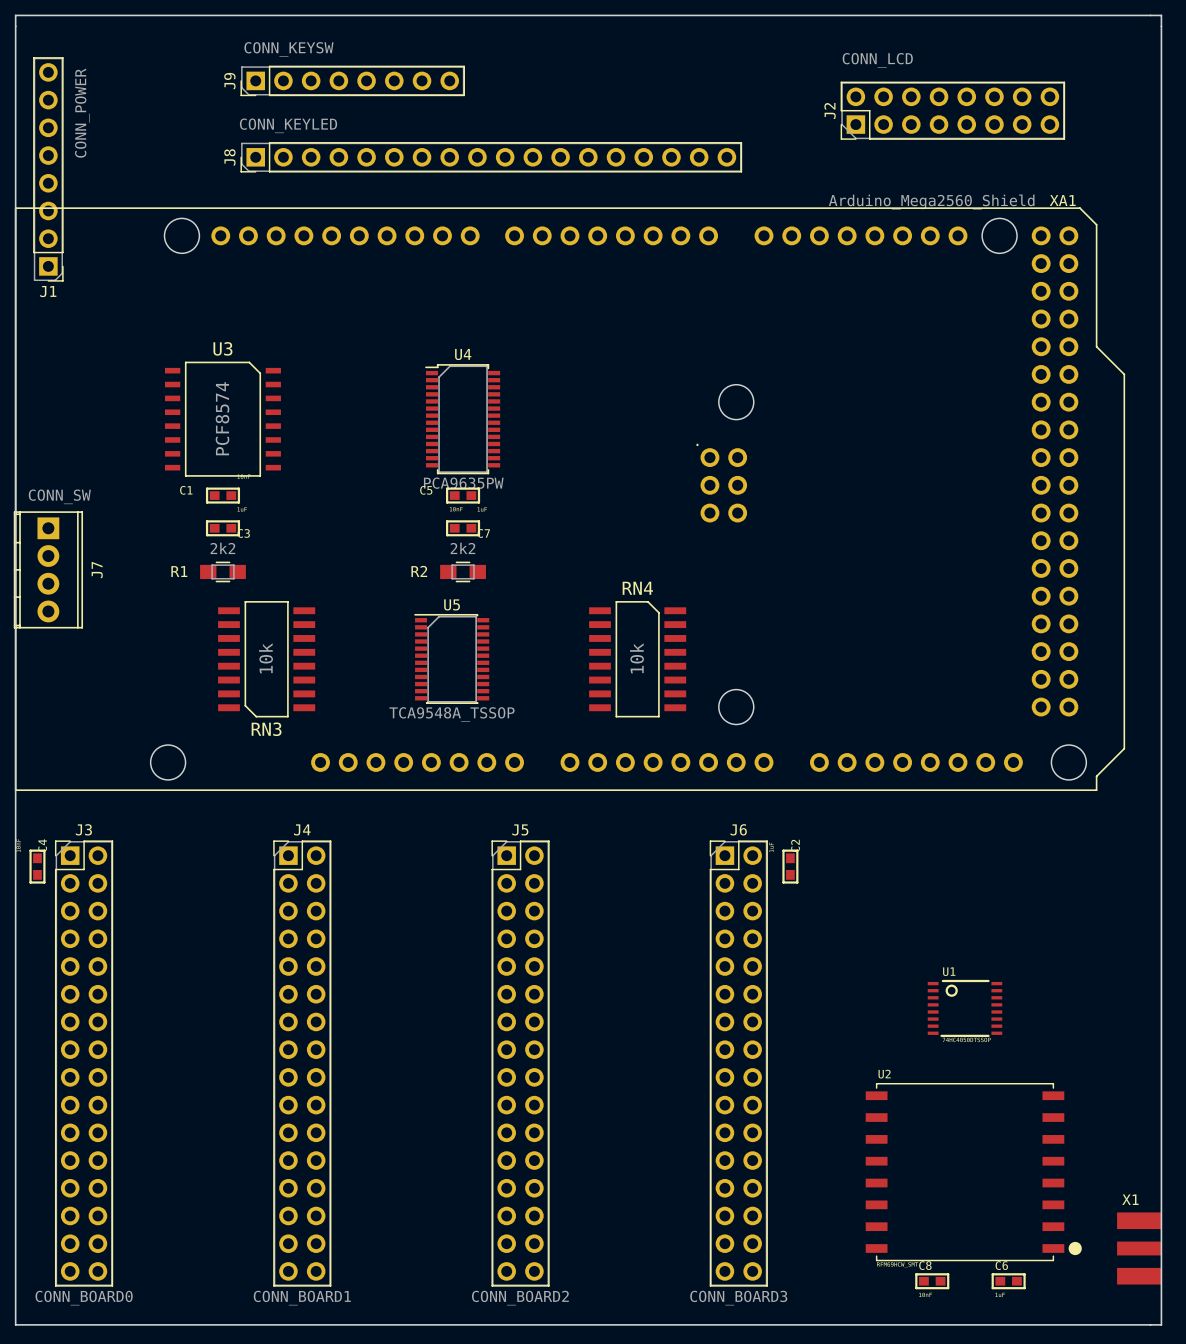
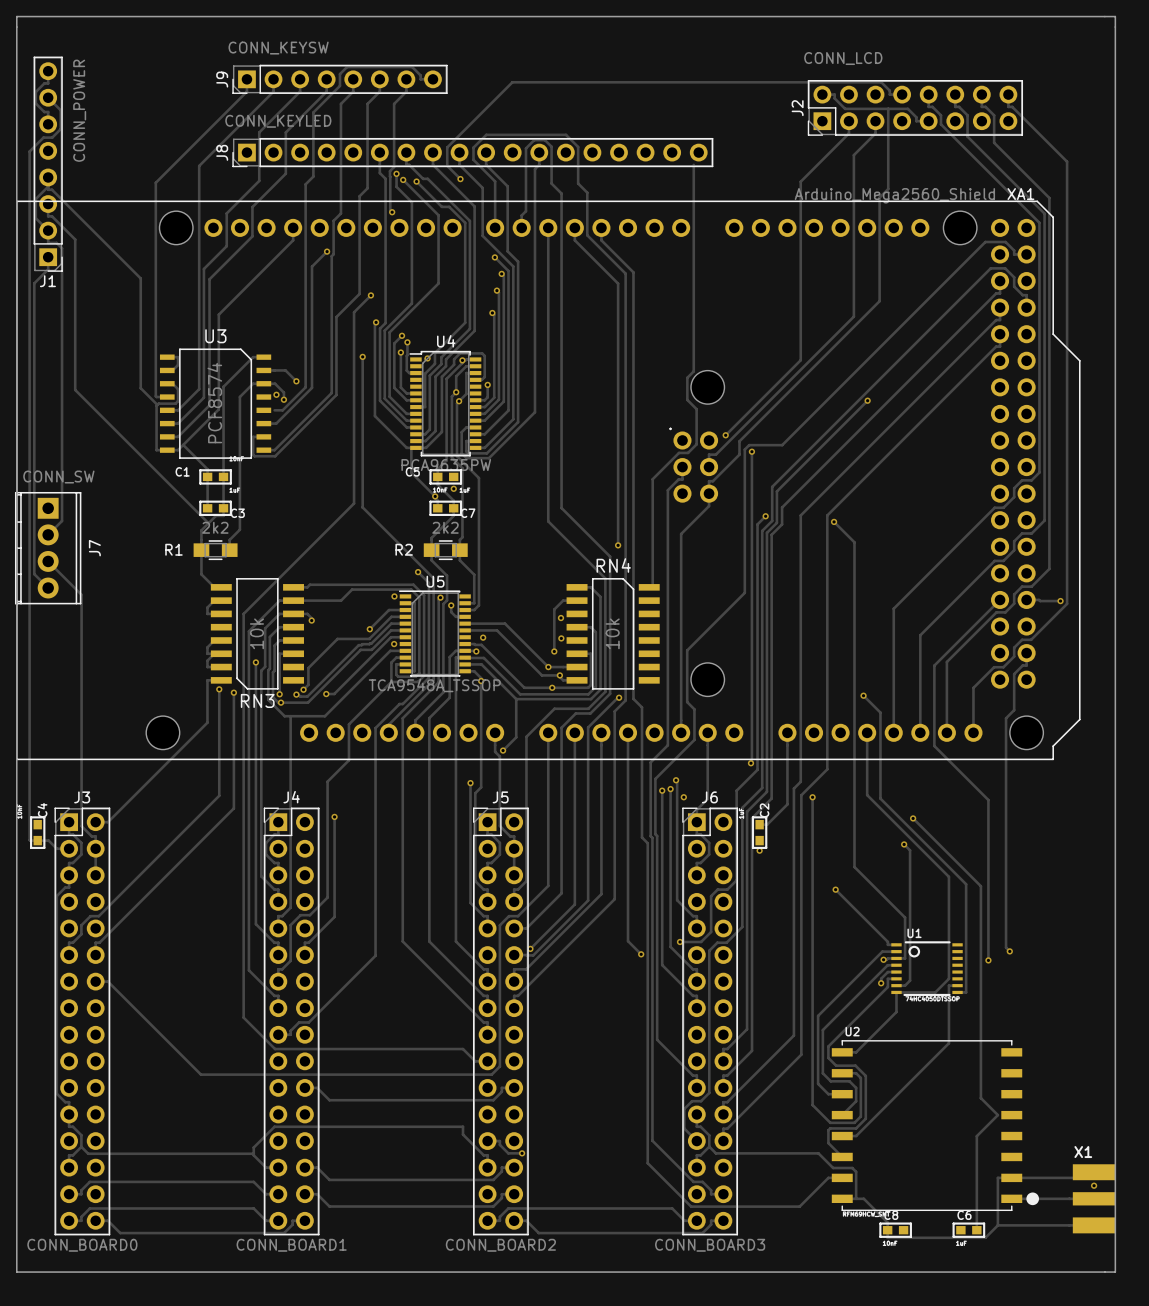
track: none -> (48, 71) (48, 83) (44, 83) (35, 91) (35, 103) (44, 112) (48, 112) (48, 124)
track: none -> (246, 79) (246, 91) (155, 182) (155, 396) (167, 397)
track: none -> (273, 79) (273, 91) (199, 165) (199, 389) (178, 410) (167, 410)
track: none -> (300, 79) (300, 91) (259, 132) (259, 180) (226, 213) (226, 246) (203, 269) (203, 397) (178, 423) (167, 423)
track: none -> (326, 79) (326, 91) (285, 132) (285, 173) (252, 207) (252, 236) (209, 279) (209, 405) (178, 436) (167, 436)
track: none -> (353, 79) (353, 91) (340, 103) (340, 213) (333, 220) (333, 254) (331, 256) (331, 393) (274, 450) (263, 450)
track: none -> (379, 79) (379, 91) (367, 103) (367, 188) (359, 196) (359, 293) (336, 317) (336, 394) (275, 456) (253, 454) (253, 436) (263, 436)
track: none -> (406, 79) (406, 91) (394, 103) (394, 167) (389, 171) (390, 210) (392, 212)
track: none -> (432, 79) (420, 79) (420, 75) (412, 67) (347, 67) (339, 74) (339, 85) (313, 112) (313, 176) (305, 184) (305, 387) (282, 410) (274, 410)
track: none -> (822, 94) (834, 94) (834, 98) (845, 108) (907, 108) (916, 117) (916, 121) (928, 121)
track: none -> (902, 94) (889, 94) (889, 90) (881, 82) (512, 82) (447, 147) (447, 165) (460, 179)
track: none -> (928, 94) (928, 106) (932, 106) (940, 115) (940, 124) (1039, 222) (1039, 472) (1031, 480) (1022, 480) (1014, 488) (1014, 497) (1003, 507) (994, 507) (893, 608) (893, 732)
track: none -> (955, 94) (955, 106) (959, 106) (967, 115) (967, 136) (1044, 213) (1044, 520) (1031, 533) (1022, 533) (1014, 541) (1014, 550) (1003, 560) (994, 560) (920, 635) (920, 732)
track: none -> (981, 94) (981, 106) (985, 106) (994, 115) (994, 142) (1049, 198) (1049, 568) (1031, 586) (1022, 586) (1014, 594) (1014, 603) (1005, 612) (996, 612) (946, 661) (946, 732)
track: none -> (1008, 94) (1008, 106) (1012, 106) (1067, 161) (1067, 603) (1031, 639) (1022, 639) (1014, 647) (1014, 656) (1003, 667) (994, 667) (973, 687) (973, 732)
track: none -> (48, 97) (60, 110) (60, 129) (52, 137) (43, 137) (29, 151) (29, 840) (48, 840) (56, 848) (69, 848)
track: none -> (888, 108) (888, 189) (879, 197) (879, 301) (739, 441) (739, 454) (712, 481) (709, 481) (709, 506) (681, 533) (681, 732)
track: none -> (848, 121) (848, 133) (800, 181) (800, 360) (725, 435)
track: none -> (875, 121) (875, 133) (853, 155) (853, 316) (715, 454) (709, 454) (709, 467)
track: none -> (379, 152) (379, 173) (385, 178) (385, 323) (380, 328) (380, 400) (406, 427) (415, 427)
track: none -> (406, 152) (406, 164) (409, 164) (423, 178) (427, 178) (469, 220) (469, 328) (441, 357) (441, 364) (429, 375) (429, 429) (425, 434) (415, 434)
track: none -> (432, 152) (432, 164) (474, 206) (474, 330) (446, 359) (446, 366) (435, 376) (435, 431) (425, 441) (415, 441)
track: none -> (459, 152) (459, 164) (482, 188) (482, 235) (513, 266) (513, 419) (484, 447) (475, 447)
track: none -> (486, 152) (486, 164) (507, 186) (507, 251) (518, 261) (518, 422) (486, 453) (468, 453) (466, 451) (466, 441) (475, 441)
track: none -> (539, 152) (539, 164) (534, 169) (534, 412) (489, 458) (466, 458) (461, 453) (461, 432) (466, 427) (475, 427)
track: none -> (693, 164) (693, 371) (687, 377) (687, 399) (696, 409) (696, 444) (688, 452) (679, 452) (652, 479) (652, 587) (649, 587)
track: none -> (396, 173) (396, 186) (411, 202) (411, 303) (384, 330) (384, 398) (406, 420) (415, 420)
via: none -> (396, 173)
track: none -> (48, 177) (48, 189) (52, 189) (140, 278) (140, 388) (157, 404)
via: none -> (460, 179)
track: none -> (403, 179) (438, 215) (438, 283) (389, 332) (389, 396) (406, 413) (415, 413)
via: none -> (403, 179)
track: none -> (416, 181) (441, 206) (449, 206) (465, 222) (465, 322) (434, 353) (434, 363) (425, 373) (425, 407) (415, 407)
via: none -> (416, 181)
track: none -> (48, 186) (35, 199) (35, 218) (48, 230) (48, 242) (56, 242) (62, 248) (62, 521) (48, 534)
track: none -> (48, 204) (48, 216) (52, 216) (75, 239) (75, 389) (208, 523)
via: none -> (392, 212)
track: none -> (293, 227) (293, 240) (218, 314) (218, 409) (178, 450) (156, 450) (156, 405) (158, 403) (175, 403) (178, 401) (178, 389) (172, 383) (167, 383)
track: none -> (495, 227) (495, 181) (473, 159) (473, 147) (486, 134) (566, 134) (578, 147) (578, 183) (587, 192) (587, 235) (625, 273) (625, 700) (614, 711) (614, 899) (518, 995) (514, 995) (514, 1008)
track: none -> (521, 227) (521, 215) (525, 211) (525, 148) (534, 140) (544, 140) (551, 146) (551, 183) (561, 193) (561, 508) (610, 556) (610, 693) (590, 713) (575, 713) (561, 727) (561, 893) (526, 928) (514, 928)
track: none -> (548, 227) (548, 521) (605, 578) (605, 691) (588, 708) (554, 708) (526, 736) (526, 881) (518, 889) (514, 889) (514, 901)
track: none -> (574, 227) (574, 240) (618, 283) (618, 545)
track: none -> (601, 227) (601, 240) (633, 272) (633, 698) (642, 707) (642, 837) (647, 843) (647, 1163) (691, 1206) (799, 1206) (828, 1177) (842, 1177)
track: none -> (327, 251) (312, 266) (312, 387) (276, 423) (263, 423)
via: none -> (327, 251)
track: none -> (1026, 254) (1014, 254) (1014, 250) (1005, 242) (985, 242) (782, 445) (749, 445) (744, 449) (744, 592) (687, 650) (687, 702) (694, 709) (694, 739) (655, 778) (657, 1039) (693, 1075) (696, 1075) (696, 1087)
track: none -> (48, 257) (48, 269) (34, 283) (34, 574) (48, 588)
track: none -> (494, 257) (508, 271) (508, 410) (484, 434) (475, 434)
via: none -> (494, 257)
track: none -> (501, 273) (503, 276) (503, 401) (484, 420) (475, 420)
via: none -> (501, 273)
track: none -> (1000, 281) (1000, 293) (996, 293) (782, 507) (782, 524) (771, 534) (771, 798) (752, 818) (752, 1050) (727, 1075) (723, 1075) (723, 1087)
track: none -> (496, 290) (498, 292) (498, 399) (484, 413) (475, 413)
via: none -> (496, 290)
track: none -> (370, 295) (354, 312) (354, 503) (243, 613) (243, 1017) (275, 1049) (463, 1049) (475, 1061) (487, 1061)
via: none -> (370, 295)
track: none -> (1000, 307) (1000, 320) (996, 320) (800, 515) (800, 781) (793, 788) (793, 1035) (727, 1102) (723, 1102) (723, 1114)
track: none -> (1026, 307) (1026, 295) (1022, 295) (1014, 286) (1014, 277) (1005, 268) (990, 268) (772, 486) (772, 520) (762, 530) (762, 787) (742, 807) (742, 926) (726, 942) (717, 942) (709, 950) (709, 1092) (701, 1101) (692, 1101) (684, 1108) (684, 1128) (696, 1141)
track: none -> (492, 313) (494, 314) (494, 397) (484, 407) (475, 407)
via: none -> (492, 313)
track: none -> (376, 322) (374, 416) (406, 447) (426, 447) (441, 431) (441, 376) (454, 364) (454, 359) (460, 353) (482, 353) (484, 355) (484, 377) (481, 379) (475, 379)
via: none -> (376, 322)
track: none -> (1000, 334) (1000, 346) (996, 346) (827, 515) (827, 769) (801, 795) (801, 1054) (727, 1128) (723, 1128) (723, 1141)
track: none -> (402, 335) (394, 343) (394, 387) (406, 400) (415, 400)
via: none -> (402, 335)
track: none -> (407, 342) (406, 370) (409, 373) (415, 373)
via: none -> (407, 342)
track: none -> (400, 352) (400, 387) (406, 393) (415, 393)
via: none -> (400, 352)
track: none -> (167, 357) (178, 357) (178, 365) (172, 370) (167, 370)
track: none -> (263, 357) (253, 357) (223, 386) (223, 515) (215, 515) (201, 530) (201, 574) (214, 587) (221, 587)
track: none -> (362, 356) (362, 507) (433, 578) (433, 679) (388, 724) (388, 732)
via: none -> (362, 356)
via: none -> (427, 358)
track: none -> (475, 359) (462, 360) (462, 363) (446, 378) (446, 460) (437, 469) (437, 484) (453, 500) (453, 515) (431, 537) (431, 560) (447, 575) (447, 600) (443, 604) (443, 692) (415, 720) (415, 732)
via: none -> (462, 360)
track: none -> (475, 366) (466, 366) (456, 376) (456, 392) (451, 396) (451, 457) (462, 468) (462, 537) (459, 539) (459, 560) (474, 574) (474, 603) (465, 603)
track: none -> (263, 370) (285, 370) (296, 381)
track: none -> (475, 373) (466, 373) (466, 393) (456, 403) (456, 456) (478, 478) (478, 605) (474, 610) (465, 610)
via: none -> (296, 381)
track: none -> (487, 384) (487, 397) (484, 400) (475, 400)
via: none -> (487, 384)
via: none -> (456, 392)
via: none -> (276, 394)
track: none -> (283, 399) (283, 392) (275, 383) (253, 383) (239, 396) (239, 529) (229, 539) (229, 550)
via: none -> (283, 399)
via: none -> (459, 401)
track: none -> (867, 400) (776, 491) (776, 522) (766, 532) (766, 791) (747, 811) (747, 1029) (727, 1049) (723, 1049) (723, 1061)
via: none -> (867, 400)
via: none -> (725, 435)
track: none -> (183, 444) (207, 469) (207, 508)
track: none -> (411, 447) (411, 472) (435, 496) (437, 500) (437, 508)
track: none -> (751, 451) (750, 763)
via: none -> (751, 451)
track: none -> (682, 467) (682, 479) (678, 479) (667, 490) (667, 745) (650, 762) (652, 1140) (693, 1181) (702, 1181) (711, 1190) (711, 1194) (723, 1194)
via: none -> (453, 488)
via: none -> (435, 496)
track: none -> (765, 516) (757, 524) (757, 769) (736, 790) (736, 880) (727, 889) (717, 889) (711, 896) (711, 931) (701, 941) (680, 941)
via: none -> (765, 516)
track: none -> (834, 521) (854, 542) (854, 867) (905, 917) (905, 958) (883, 959)
via: none -> (834, 521)
via: none -> (618, 545)
track: none -> (48, 561) (81, 594) (81, 826) (91, 836) (95, 836) (95, 875)
track: none -> (418, 572) (428, 582) (428, 677) (375, 728) (375, 955) (308, 1022) (299, 1022) (290, 1030) (290, 1034) (278, 1034)
via: none -> (418, 572)
track: none -> (293, 587) (307, 587) (309, 584) (413, 584) (424, 595) (424, 675) (418, 681) (391, 681)
track: none -> (577, 587) (590, 587) (600, 596) (600, 689) (590, 699) (516, 699)
via: none -> (394, 596)
track: none -> (440, 597) (438, 599) (438, 682) (402, 718) (402, 941) (483, 1022) (487, 1022) (487, 1034)
via: none -> (440, 597)
track: none -> (1000, 599) (934, 665) (934, 746) (988, 800) (988, 960)
track: none -> (1026, 599) (1060, 601)
track: none -> (214, 600) (207, 607) (207, 613) (221, 613)
track: none -> (577, 600) (563, 600) (554, 609) (554, 651)
via: none -> (1060, 601)
track: none -> (405, 603) (414, 603) (414, 671) (405, 671)
track: none -> (451, 605) (451, 612) (455, 616) (465, 616)
via: none -> (451, 605)
track: none -> (405, 610) (389, 610) (369, 629)
track: none -> (405, 616) (391, 616) (369, 638) (337, 638) (308, 668) (308, 684) (303, 689)
via: none -> (560, 618)
track: none -> (311, 620) (307, 613) (279, 613) (265, 628) (265, 666) (261, 670) (261, 876) (274, 889) (278, 889) (278, 901)
via: none -> (311, 620)
track: none -> (405, 623) (391, 623) (371, 643) (358, 645) (307, 696) (296, 694)
track: none -> (465, 623) (504, 623) (548, 667) (577, 667)
track: none -> (293, 627) (279, 627) (269, 636) (268, 699) (284, 716) (324, 716) (390, 650) (405, 650)
track: none -> (577, 627) (590, 627) (595, 632) (595, 686) (588, 694) (520, 694) (483, 657) (455, 657) (455, 941) (483, 969) (487, 969) (487, 981)
via: none -> (369, 629)
track: none -> (405, 630) (391, 630) (371, 649) (360, 649) (307, 702) (278, 702) (273, 697) (274, 645) (279, 640) (293, 640)
track: none -> (465, 630) (497, 630) (541, 675) (559, 675) (563, 680) (577, 680)
track: none -> (405, 637) (391, 637) (334, 694) (326, 694)
via: none -> (483, 637)
via: none -> (561, 638)
track: none -> (214, 640) (207, 647) (207, 653) (221, 653)
via: none -> (394, 644)
track: none -> (465, 644) (481, 644) (524, 687) (588, 687) (590, 685) (590, 653) (577, 653)
track: none -> (476, 651) (455, 650) (449, 657) (449, 697) (429, 718) (429, 941) (483, 995) (487, 995) (487, 1008)
via: none -> (476, 651)
via: none -> (554, 651)
track: none -> (1026, 653) (1026, 665) (1022, 665) (1014, 674) (1014, 710) (1006, 718) (1006, 947) (1009, 951)
track: none -> (214, 653) (207, 660) (207, 667) (221, 667)
track: none -> (293, 653) (279, 653) (279, 694)
track: none -> (405, 657) (396, 657) (391, 662) (391, 681)
track: none -> (255, 662) (255, 924) (274, 942) (278, 942) (278, 955)
via: none -> (255, 662)
track: none -> (405, 664) (396, 664) (396, 674) (398, 676) (415, 676) (419, 673) (419, 597) (411, 589) (352, 589) (341, 600) (279, 600) (248, 631) (248, 970) (274, 995) (278, 995) (278, 1008)
track: none -> (465, 664) (481, 664) (516, 699)
via: none -> (548, 667)
track: none -> (465, 671) (474, 671) (481, 678) (481, 787) (475, 793) (475, 881) (483, 889) (487, 889) (487, 901)
via: none -> (559, 675)
track: none -> (221, 680) (207, 680) (207, 722) (107, 822) (95, 822)
via: none -> (481, 681)
track: none -> (391, 681) (348, 724) (348, 760) (327, 781) (327, 897) (309, 915) (300, 915) (290, 925) (290, 960) (282, 969) (278, 969) (278, 981)
via: none -> (552, 687)
track: none -> (219, 689) (219, 795) (98, 916) (90, 916) (81, 925) (81, 934) (72, 942) (69, 942) (69, 955)
via: none -> (219, 689)
via: none -> (303, 689)
track: none -> (233, 692) (233, 808) (99, 942) (95, 942) (95, 955)
via: none -> (233, 692)
via: none -> (279, 694)
via: none -> (296, 694)
via: none -> (326, 694)
track: none -> (863, 695) (880, 712) (880, 798) (966, 884) (966, 992) (957, 992)
via: none -> (863, 695)
track: none -> (619, 697) (588, 727) (588, 900) (533, 955) (514, 955)
via: none -> (619, 697)
track: none -> (516, 699) (516, 737) (503, 750)
via: none -> (281, 702)
track: none -> (290, 716) (290, 907) (282, 916) (278, 916) (278, 928)
track: none -> (495, 732) (495, 751) (499, 756) (499, 826) (510, 836) (514, 836) (514, 875)
track: none -> (548, 732) (548, 885) (518, 916) (509, 916) (499, 925) (499, 1066) (491, 1074) (200, 1074) (107, 981) (95, 981)
track: none -> (574, 732) (574, 904) (530, 948)
track: none -> (601, 732) (601, 894) (526, 969) (514, 969) (514, 981)
track: none -> (628, 732) (628, 941) (641, 954)
track: none -> (707, 732) (707, 798) (696, 809) (696, 834) (700, 834) (709, 842) (709, 854) (700, 863) (696, 863) (696, 875)
track: none -> (787, 732) (787, 804) (767, 824) (759, 824)
track: none -> (867, 732) (867, 795) (948, 876) (948, 978) (935, 992) (896, 992) (896, 1011) (856, 1052) (842, 1052)
via: none -> (503, 750)
via: none -> (750, 763)
track: none -> (676, 780) (677, 900) (693, 916) (696, 916) (696, 928)
via: none -> (676, 780)
track: none -> (470, 783) (470, 902) (483, 916) (487, 916) (487, 928)
via: none -> (470, 783)
track: none -> (670, 789) (670, 946) (693, 969) (696, 969) (696, 981)
via: none -> (670, 789)
track: none -> (662, 790) (662, 965) (693, 995) (696, 995) (696, 1008)
via: none -> (662, 790)
via: none -> (683, 797)
track: none -> (812, 797) (812, 1105) (830, 1122) (854, 1122) (860, 1116) (860, 1077) (856, 1073) (842, 1073)
via: none -> (812, 797)
track: none -> (334, 816) (334, 916) (308, 942) (304, 942) (304, 955)
via: none -> (334, 816)
track: none -> (913, 818) (980, 886) (980, 1098) (997, 1115) (976, 1136) (976, 1230)
via: none -> (913, 818)
track: none -> (69, 822) (69, 834) (72, 834) (81, 842) (81, 854) (72, 863) (69, 863) (69, 887) (65, 887) (56, 896) (56, 1093) (65, 1102) (69, 1102) (69, 1126) (72, 1126) (81, 1135) (81, 1146)
track: none -> (278, 822) (278, 834) (274, 834) (266, 842) (266, 854) (274, 863) (278, 863) (278, 875)
track: none -> (487, 822) (487, 834) (491, 834) (499, 842) (499, 854) (491, 863) (487, 863) (487, 875)
track: none -> (904, 844) (910, 850) (910, 980) (905, 985) (896, 985)
via: none -> (904, 844)
via: none -> (759, 850)
track: none -> (835, 889) (887, 941) (887, 944) (896, 944)
via: none -> (835, 889)
via: none -> (680, 941)
via: none -> (530, 948)
track: none -> (896, 951) (882, 951) (818, 1015) (818, 1083) (828, 1094) (842, 1094)
via: none -> (1009, 951)
via: none -> (641, 954)
via: none -> (883, 959)
via: none -> (988, 960)
track: none -> (896, 965) (887, 965) (822, 1030) (822, 1073) (830, 1081) (849, 1081) (856, 1087) (856, 1101) (842, 1115)
track: none -> (896, 972) (887, 972) (881, 978) (881, 983)
track: none -> (896, 978) (887, 978) (887, 987) (828, 1046) (828, 1057) (836, 1065) (855, 1065) (865, 1075) (865, 1118) (856, 1128) (830, 1128) (828, 1130) (828, 1143) (842, 1156)
via: none -> (881, 983)
track: none -> (957, 985) (948, 985) (948, 1043) (856, 1136) (842, 1136)
track: none -> (304, 1087) (317, 1087) (329, 1100) (493, 1100) (501, 1091) (501, 1087) (514, 1087)
track: none -> (696, 1114) (696, 1126) (700, 1126) (709, 1135) (709, 1146)
track: none -> (487, 1141) (499, 1141) (499, 1144) (508, 1153) (522, 1153)
track: none -> (81, 1146) (72, 1155) (69, 1155) (69, 1167)
track: none -> (81, 1146) (88, 1153) (253, 1153)
track: none -> (709, 1146) (700, 1155) (696, 1155) (696, 1167)
track: none -> (709, 1146) (715, 1153) (818, 1153) (833, 1168) (852, 1168) (856, 1171) (856, 1198)
via: none -> (522, 1153)
track: none -> (278, 1167) (266, 1167) (253, 1155) (253, 1147) (274, 1126) (463, 1126) (463, 1134) (483, 1155) (487, 1155) (487, 1167)
track: none -> (304, 1167) (317, 1167) (329, 1179) (493, 1179) (501, 1171) (501, 1167) (514, 1167)
track: none -> (1094, 1177) (997, 1177) (997, 1225)
via: none -> (1094, 1185)
track: none -> (69, 1194) (81, 1194) (81, 1190) (89, 1181) (253, 1181) (266, 1194) (278, 1194)
track: none -> (304, 1194) (317, 1194) (329, 1206) (493, 1206) (501, 1198) (501, 1194) (514, 1194)
track: none -> (842, 1198) (863, 1198) (887, 1222) (887, 1237) (985, 1237) (997, 1225)
track: none -> (1011, 1198) (1094, 1198)
track: none -> (69, 1220) (81, 1220) (81, 1216) (89, 1208) (253, 1208) (266, 1220) (278, 1220)
track: none -> (95, 1220) (107, 1220) (120, 1233) (284, 1233) (292, 1224) (292, 1220) (304, 1220)
track: none -> (487, 1220) (499, 1220) (499, 1216) (508, 1208) (672, 1208) (684, 1220) (696, 1220)
track: none -> (514, 1220) (526, 1220) (538, 1233) (702, 1233) (711, 1224) (711, 1220) (723, 1220)
track: none -> (997, 1225) (1094, 1225)

